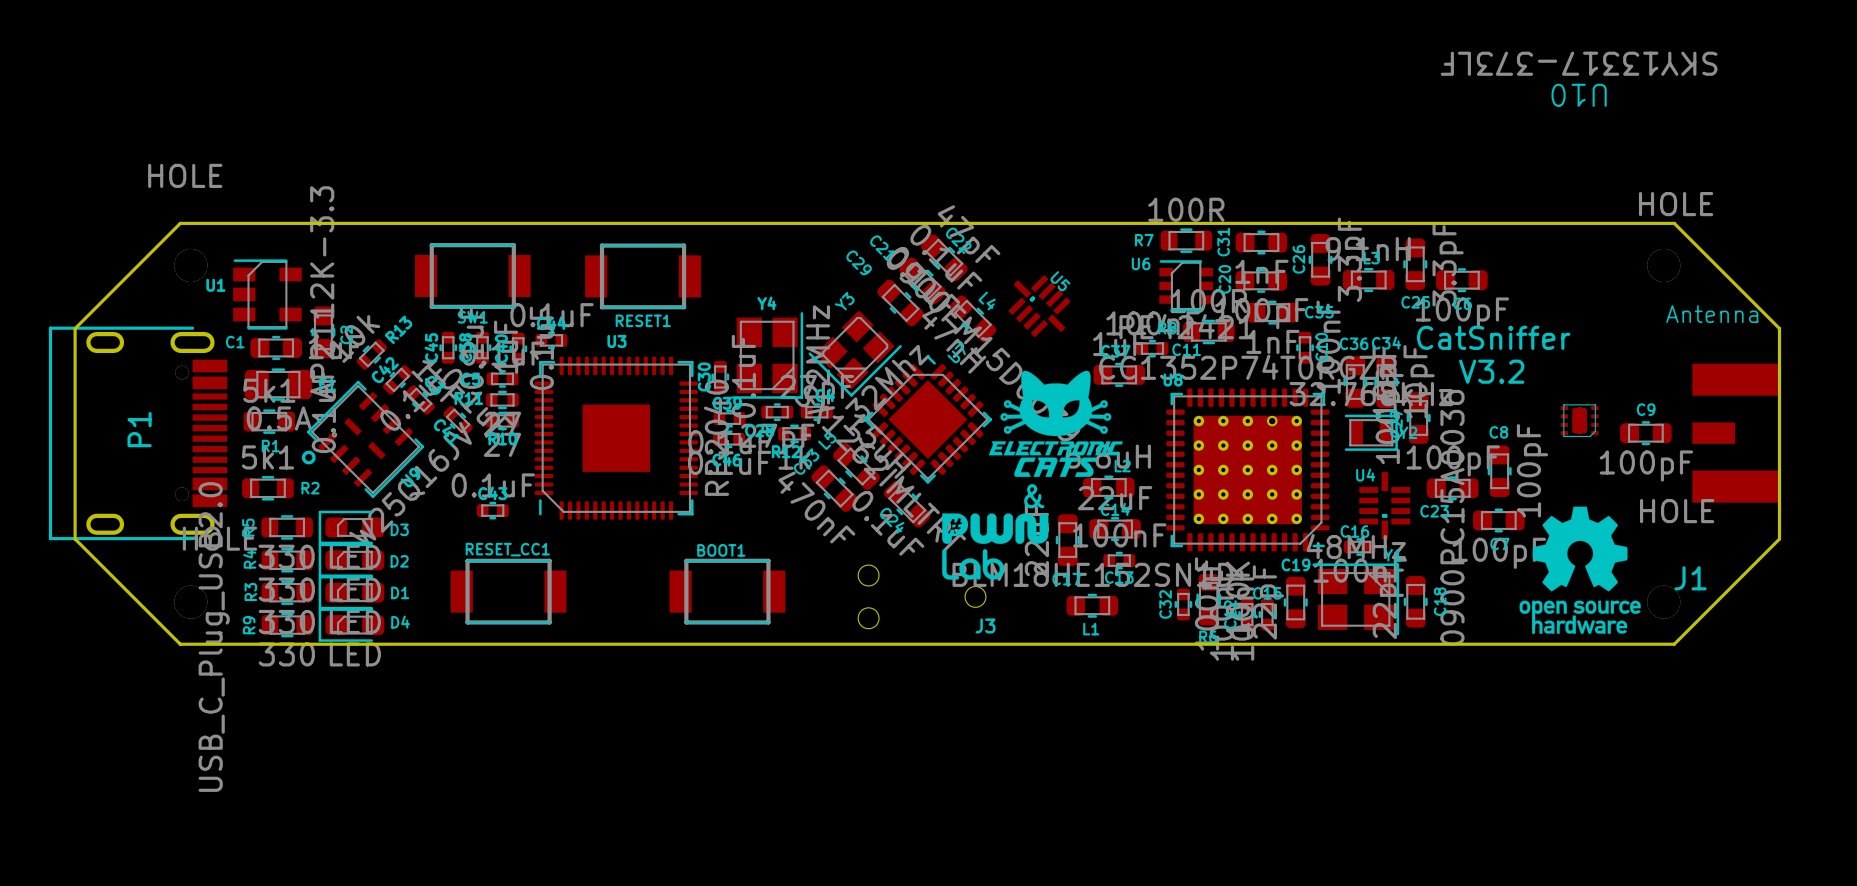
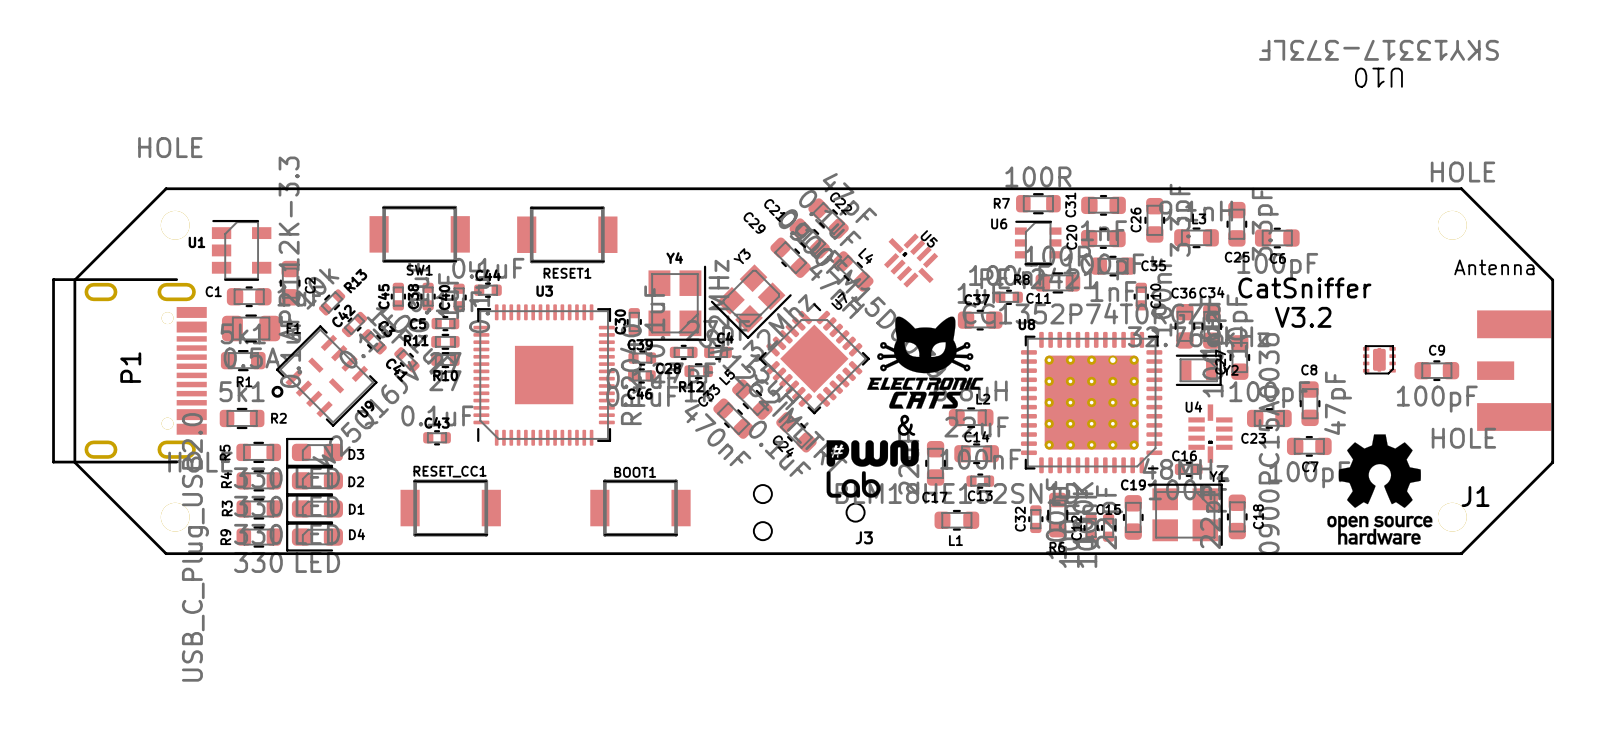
C8 value: 100pF (1532, 470) -> 47pF (1338, 403)

